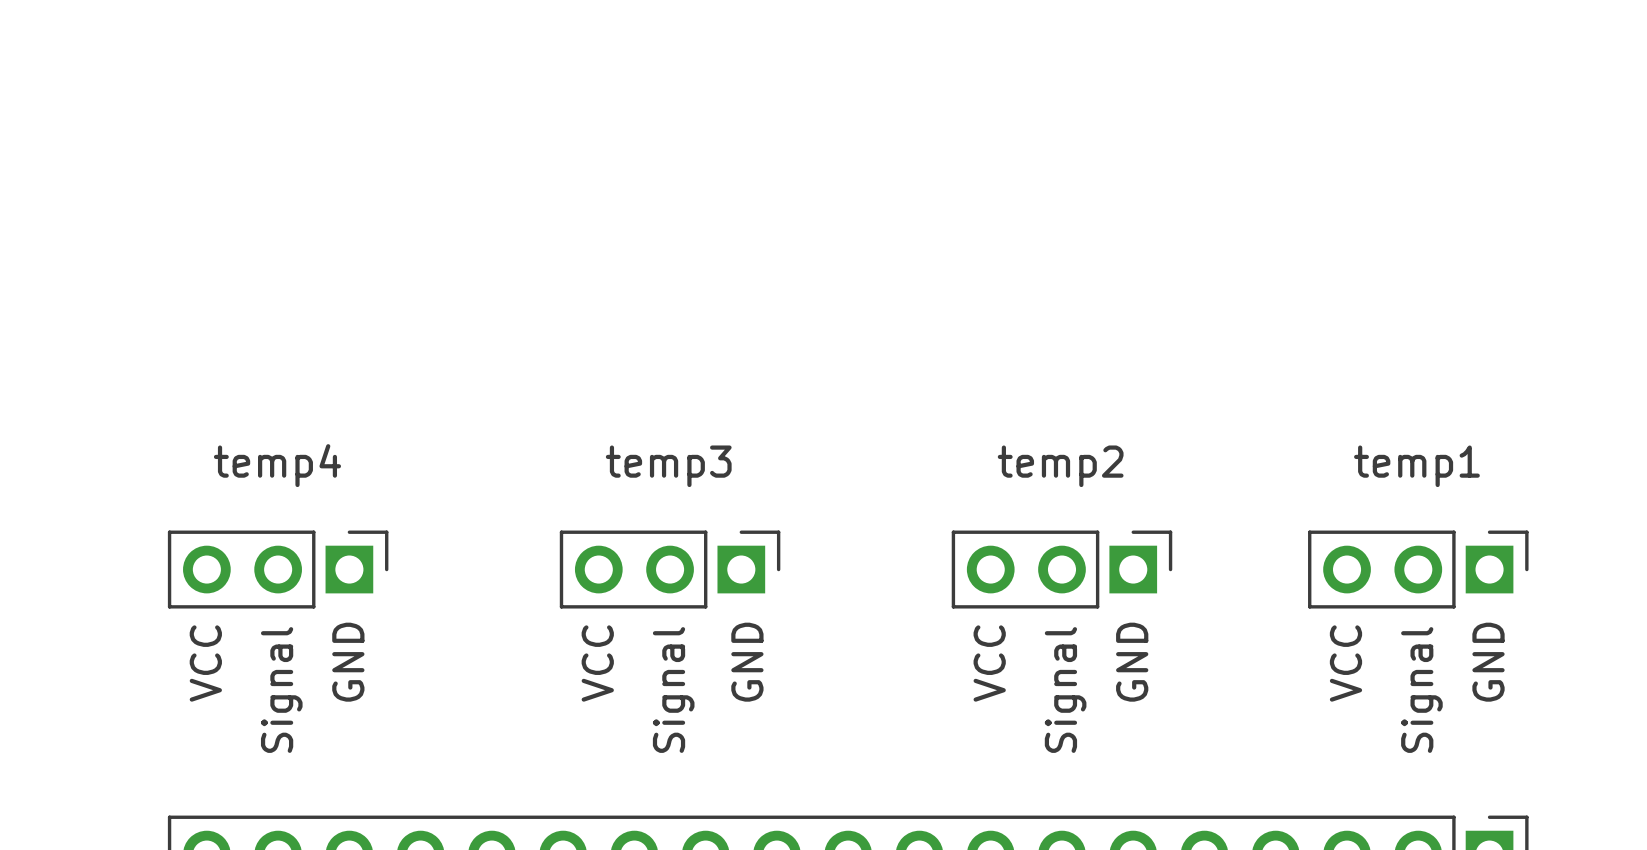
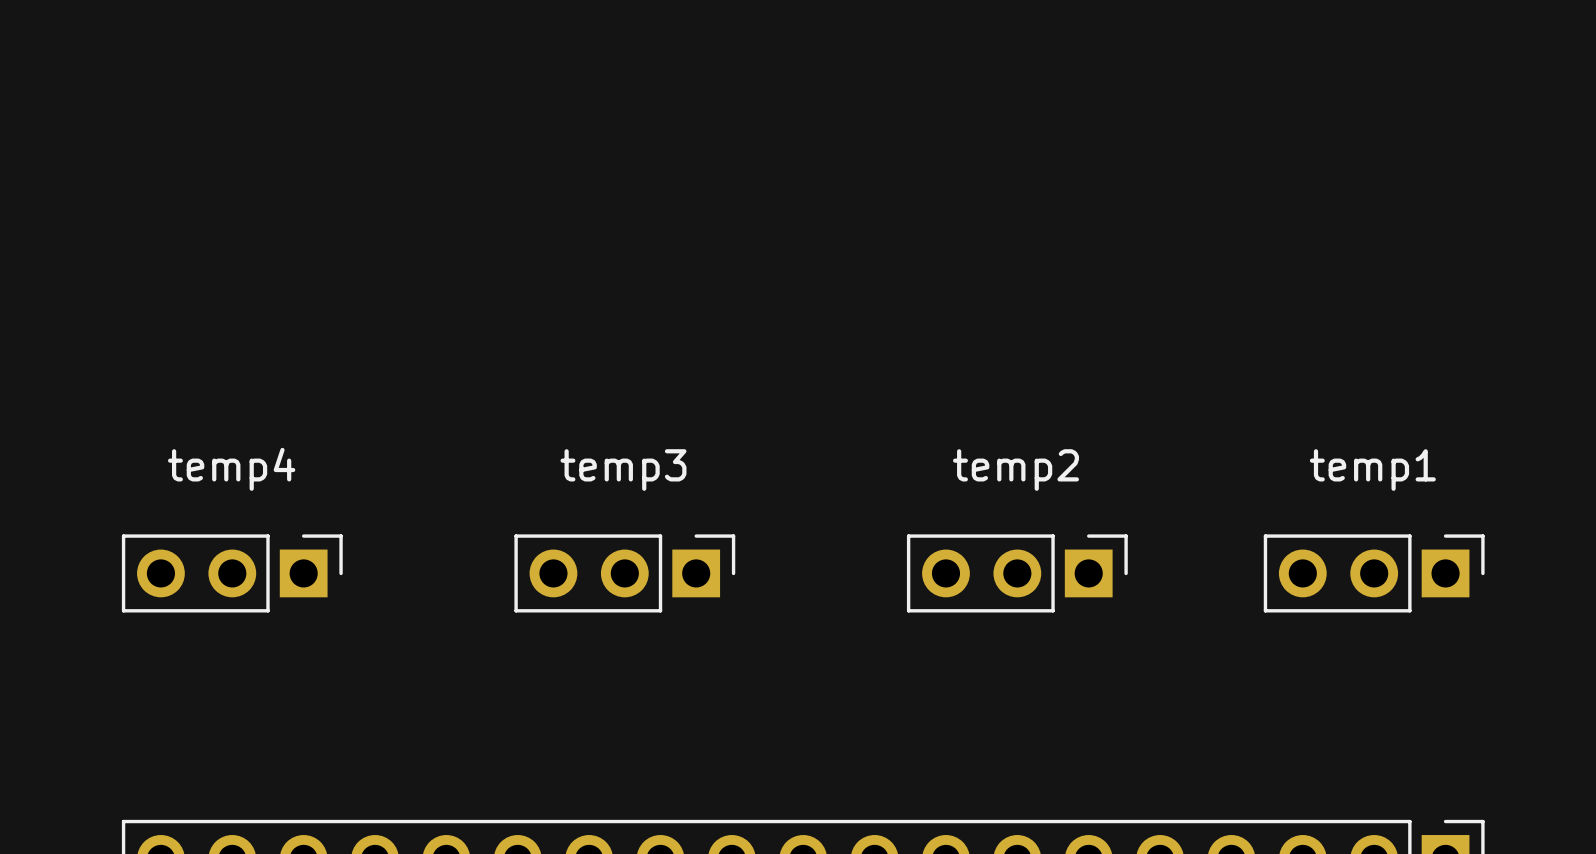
text: GND (348, 662) -> none
text: GND (747, 662) -> none
text: GND (1132, 662) -> none
text: GND (1488, 662) -> none
text: VCC (205, 663) -> none
text: VCC (597, 663) -> none
text: VCC (989, 663) -> none
text: VCC (1345, 663) -> none
text: Signal (281, 690) -> none
text: Signal (673, 690) -> none
text: Signal (1065, 690) -> none
text: Signal (1421, 690) -> none

